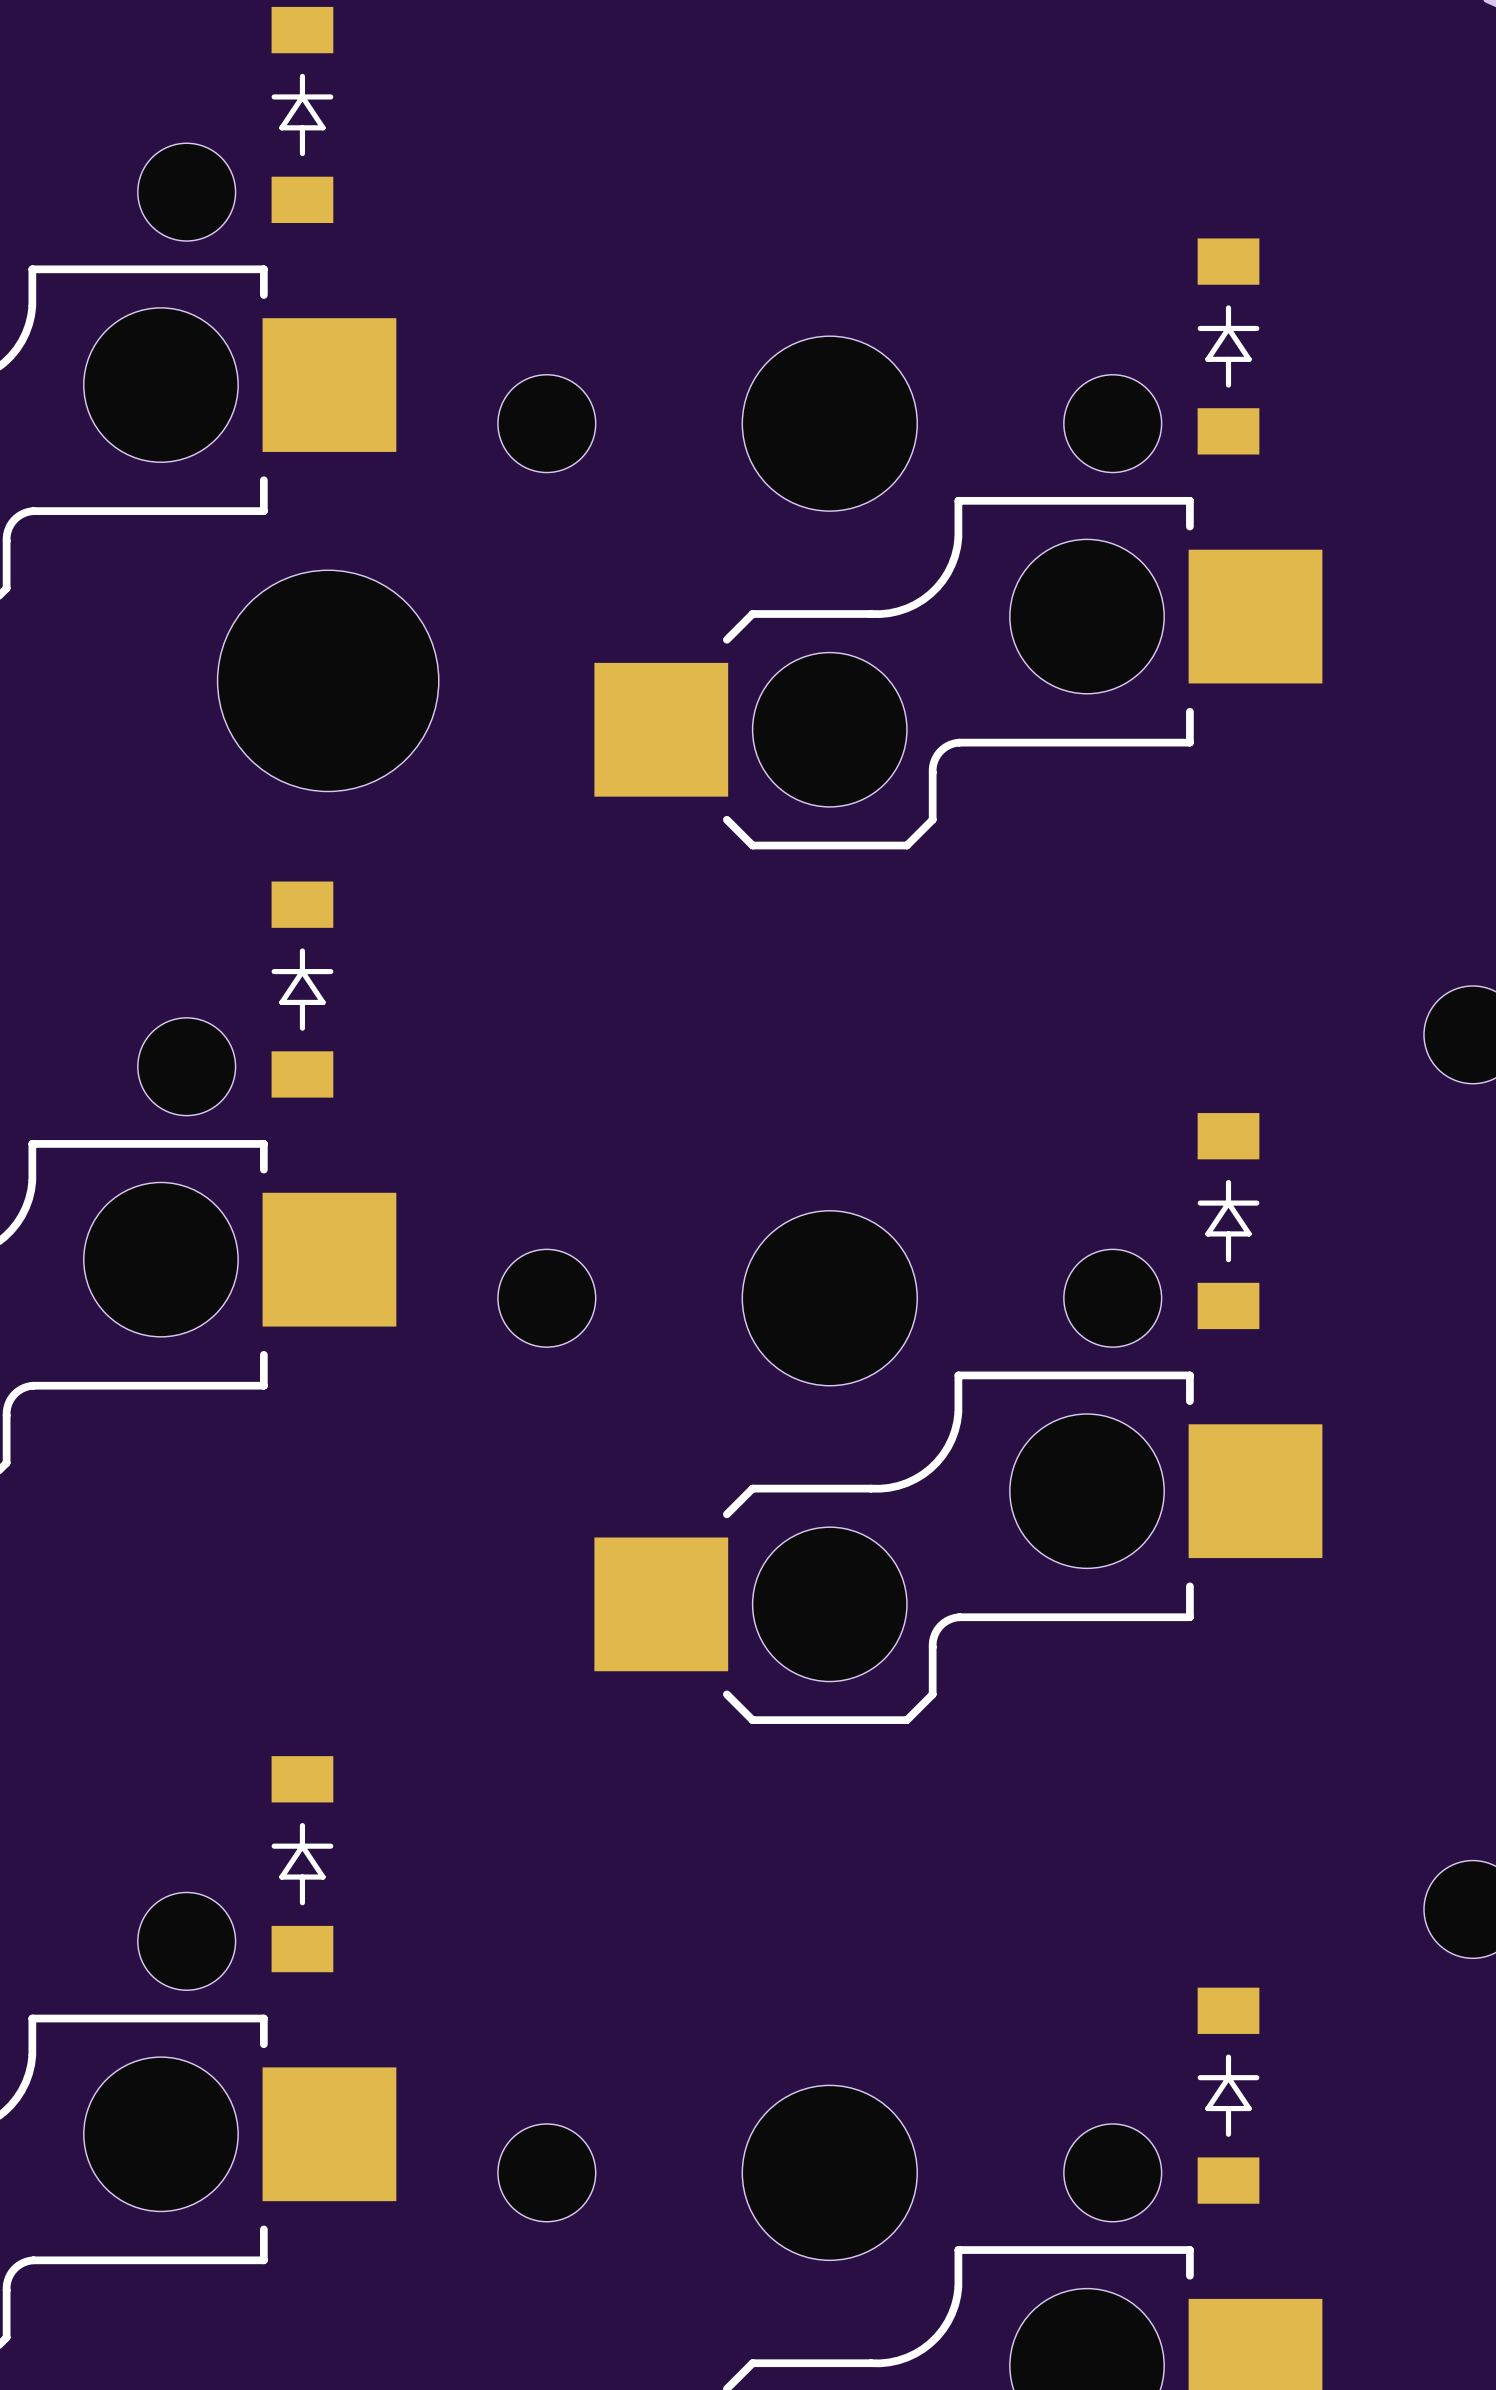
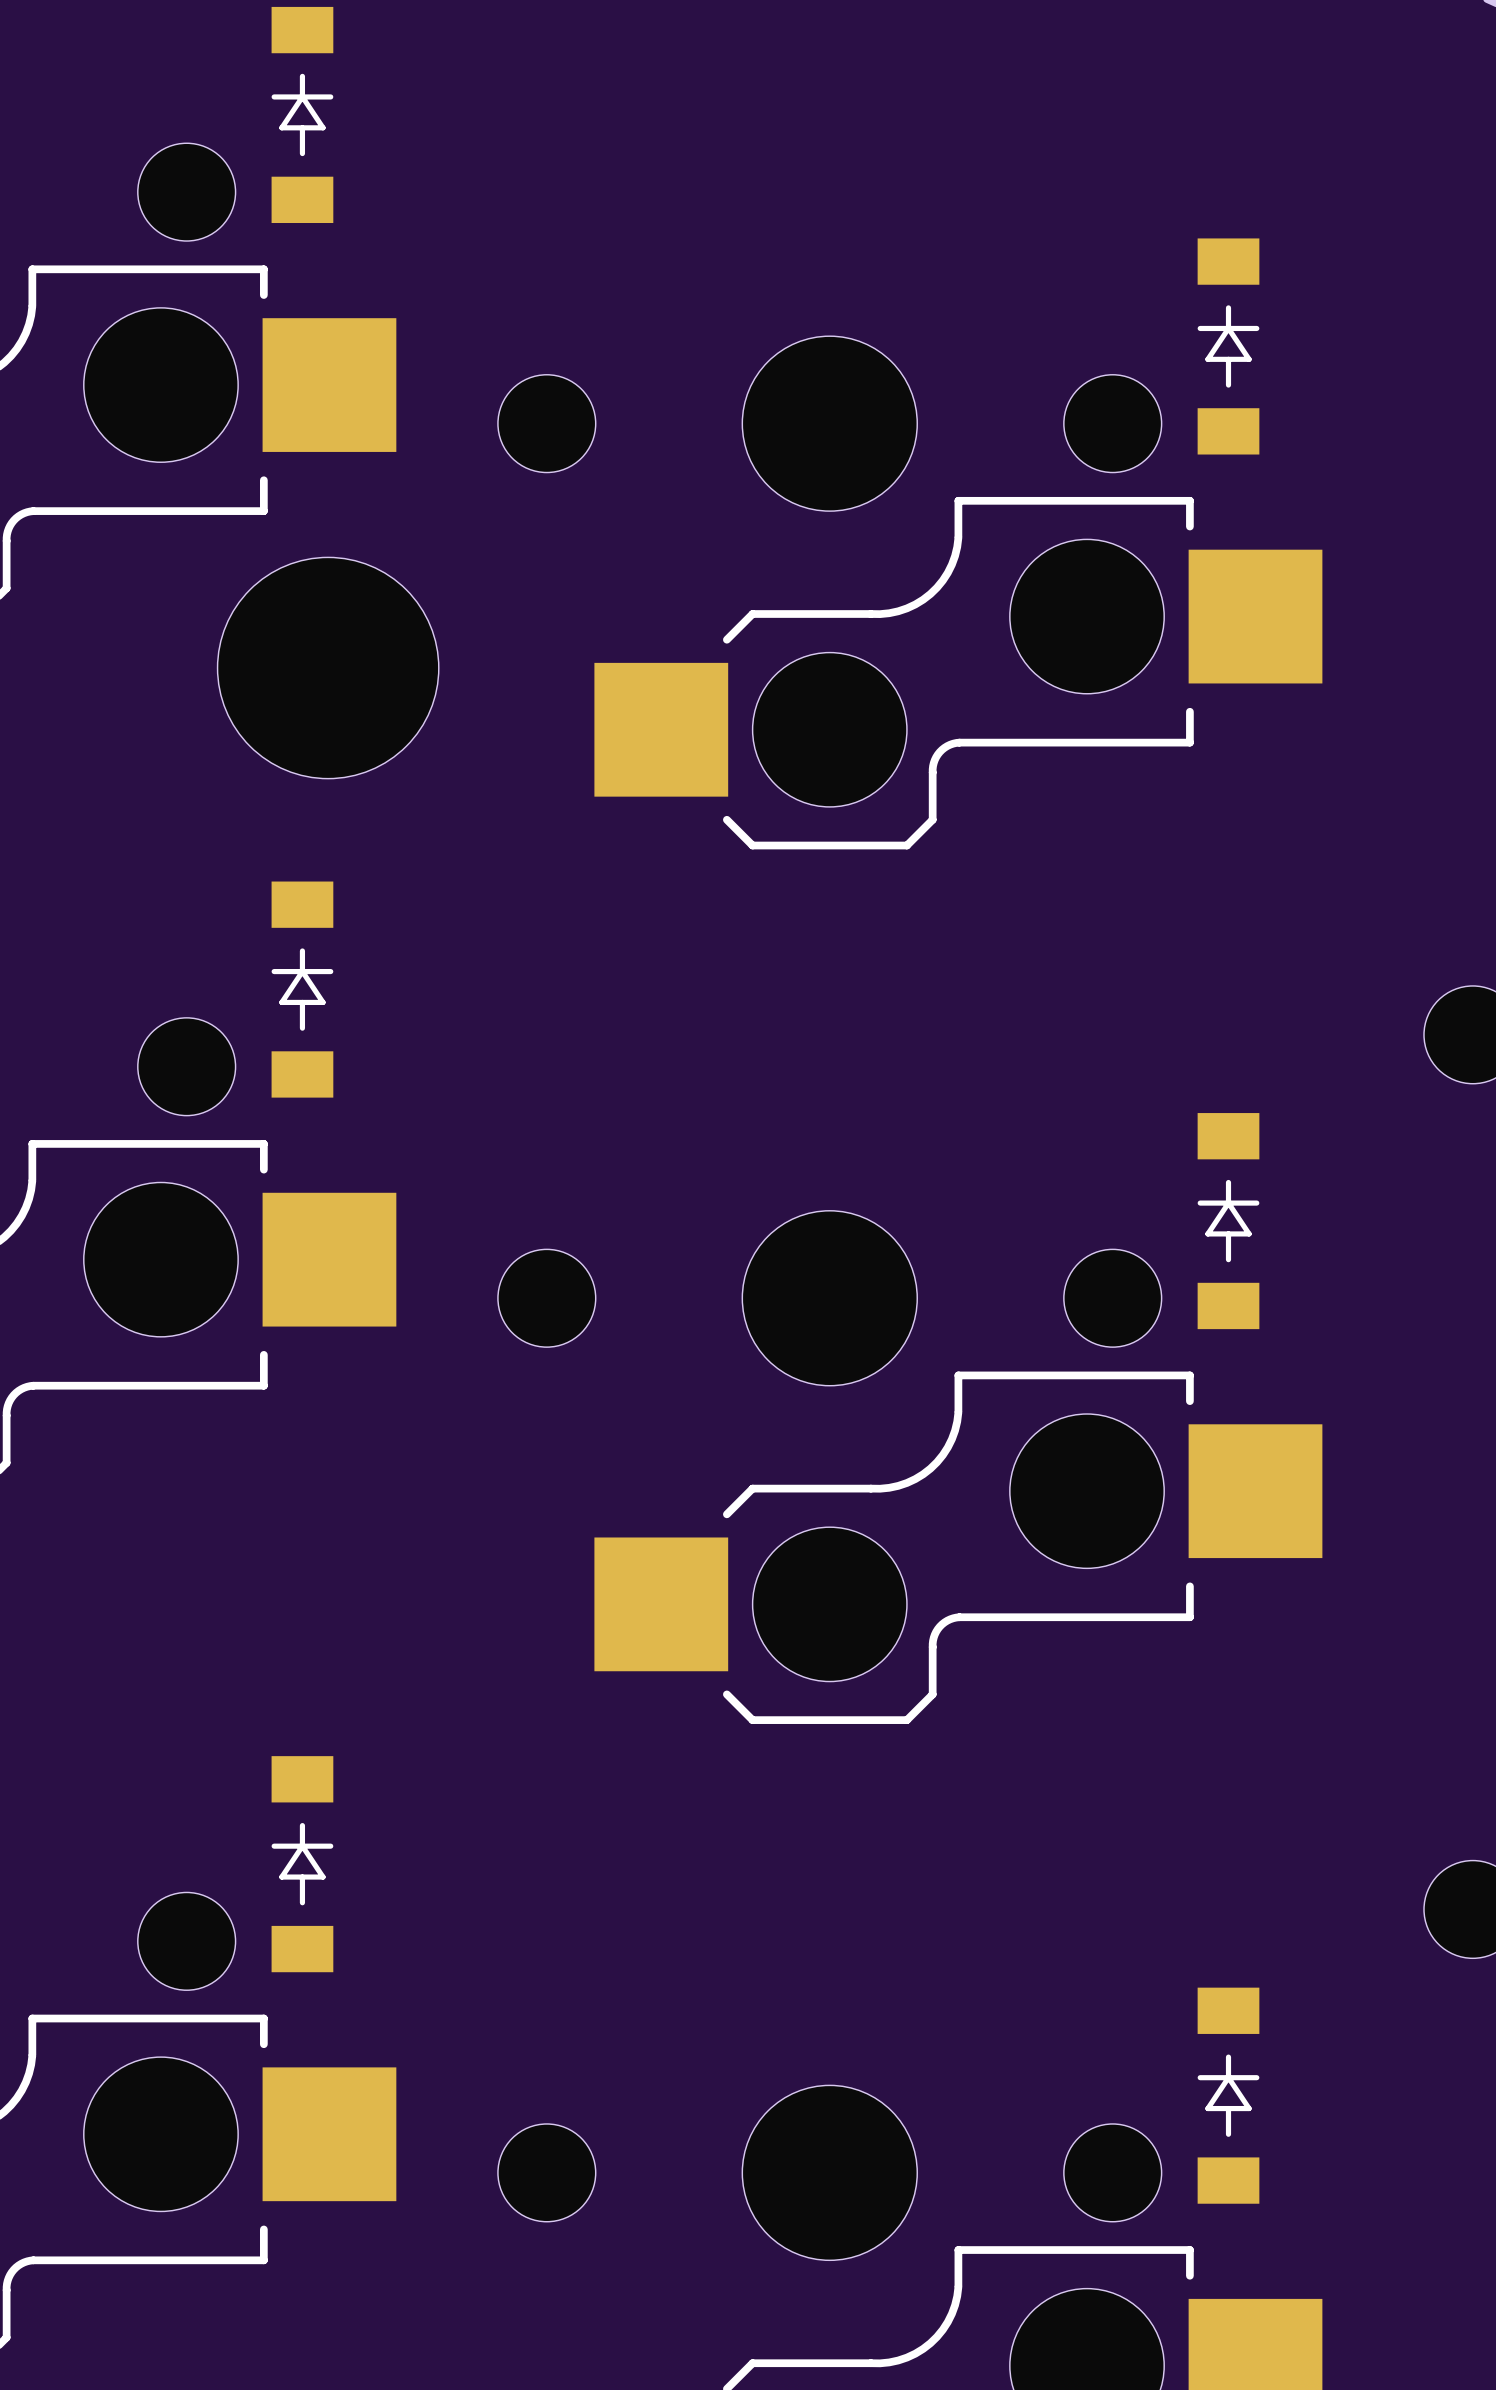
part position: (328, 680) -> (328, 668)

